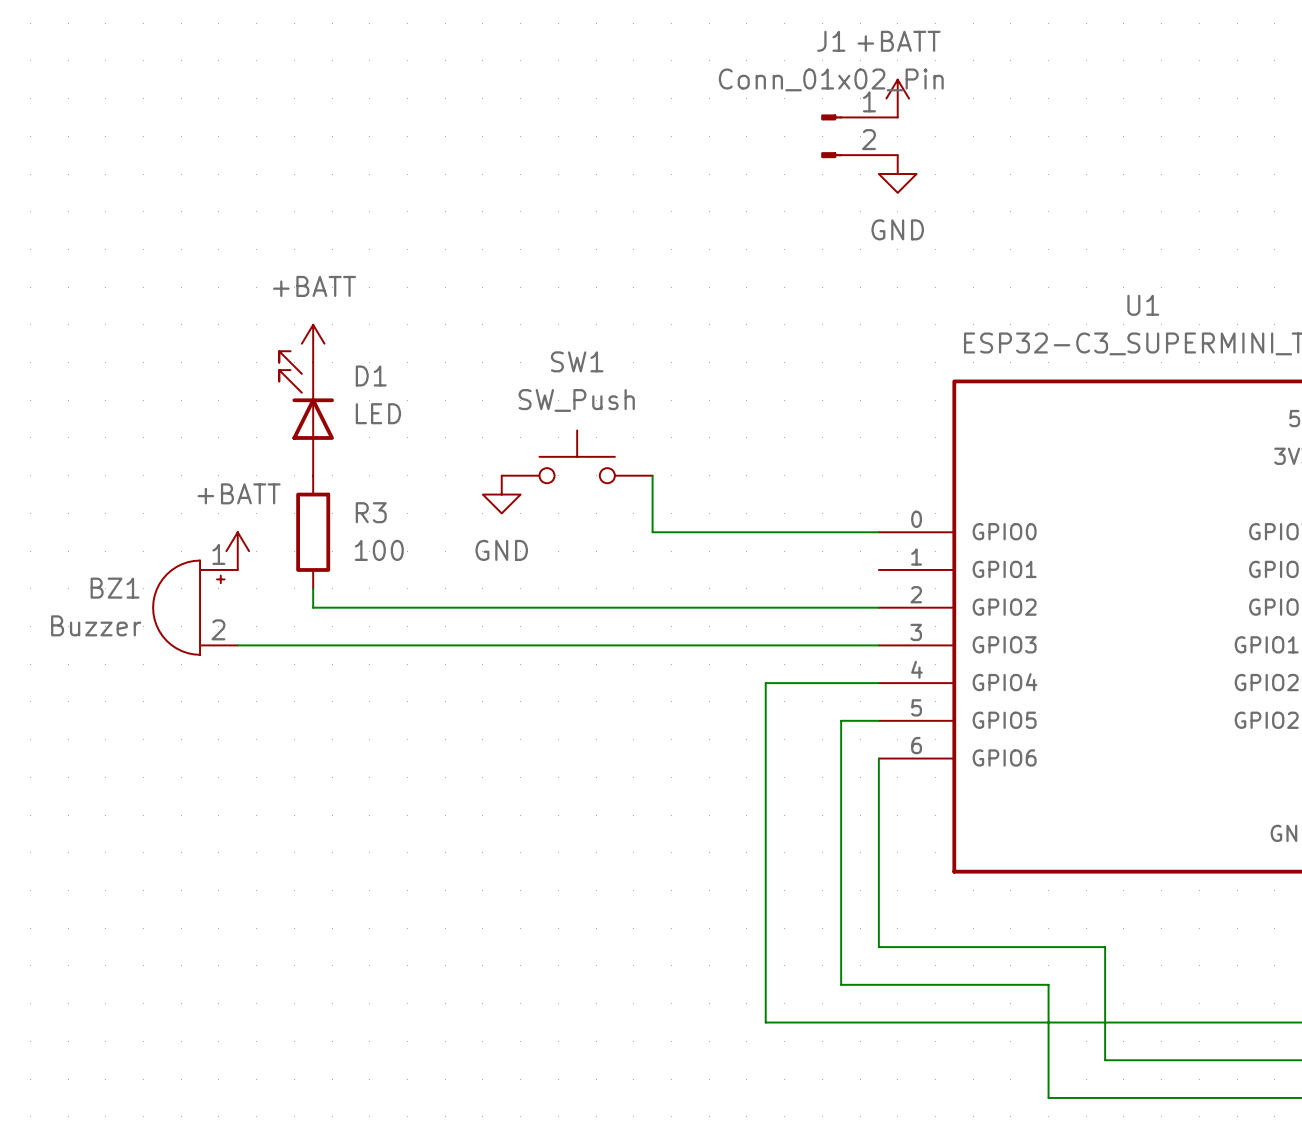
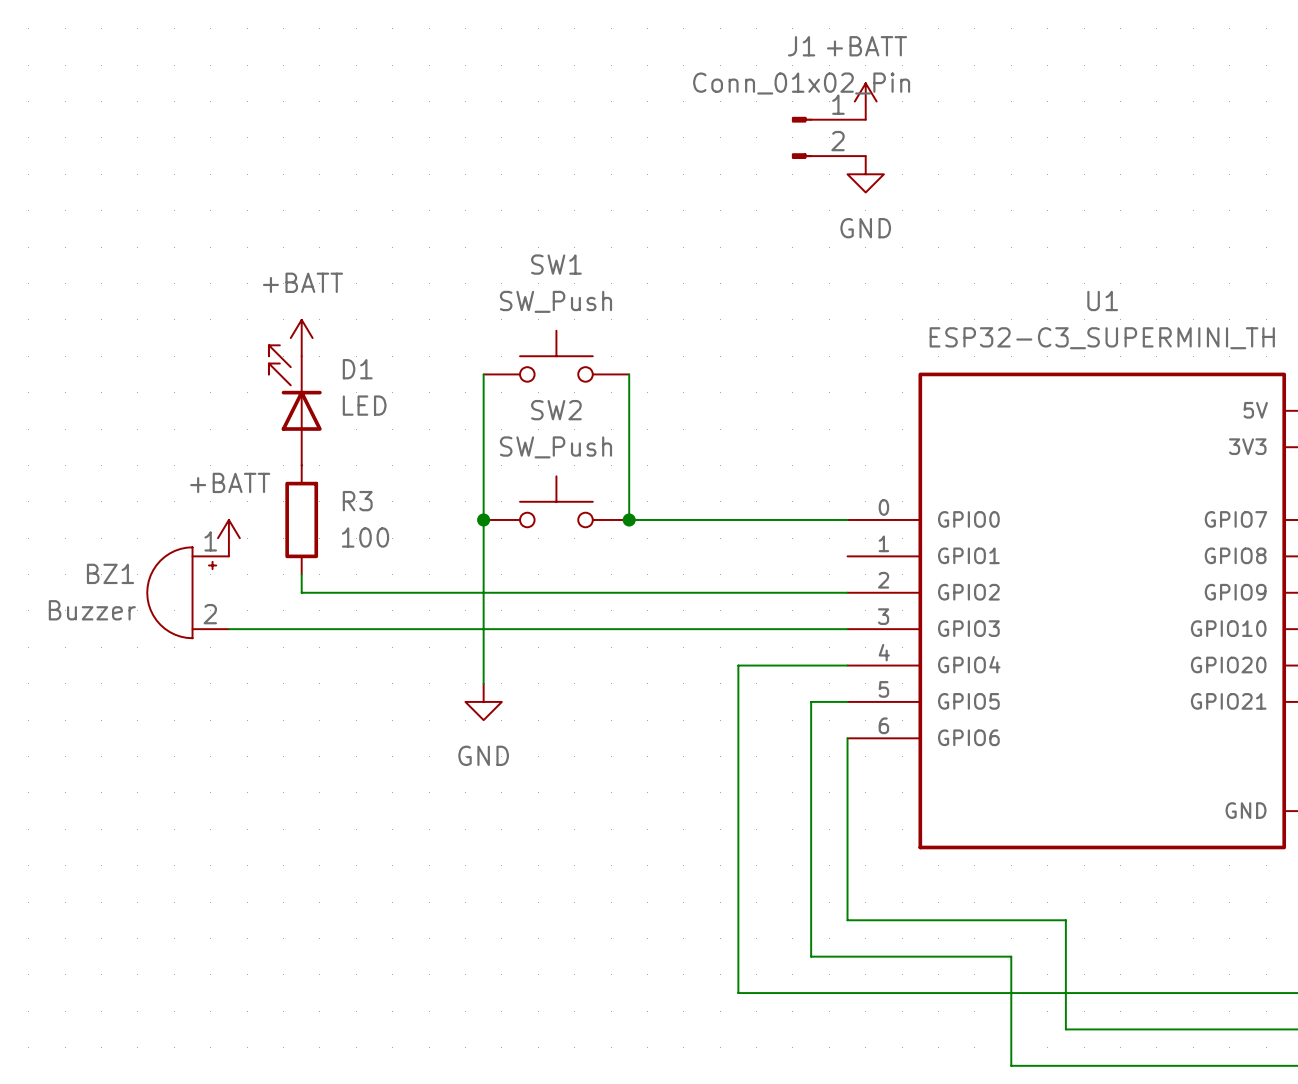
wire: none -> (483, 374) (483, 683)
wire: none -> (629, 374) (629, 465)
SW1 position: (577, 456) -> (556, 356)
power symbol position: GND (501, 494) -> GND (483, 701)
SW2: none -> SW_Push (556, 501)
junction: none -> (483, 519)
junction: none -> (629, 519)

